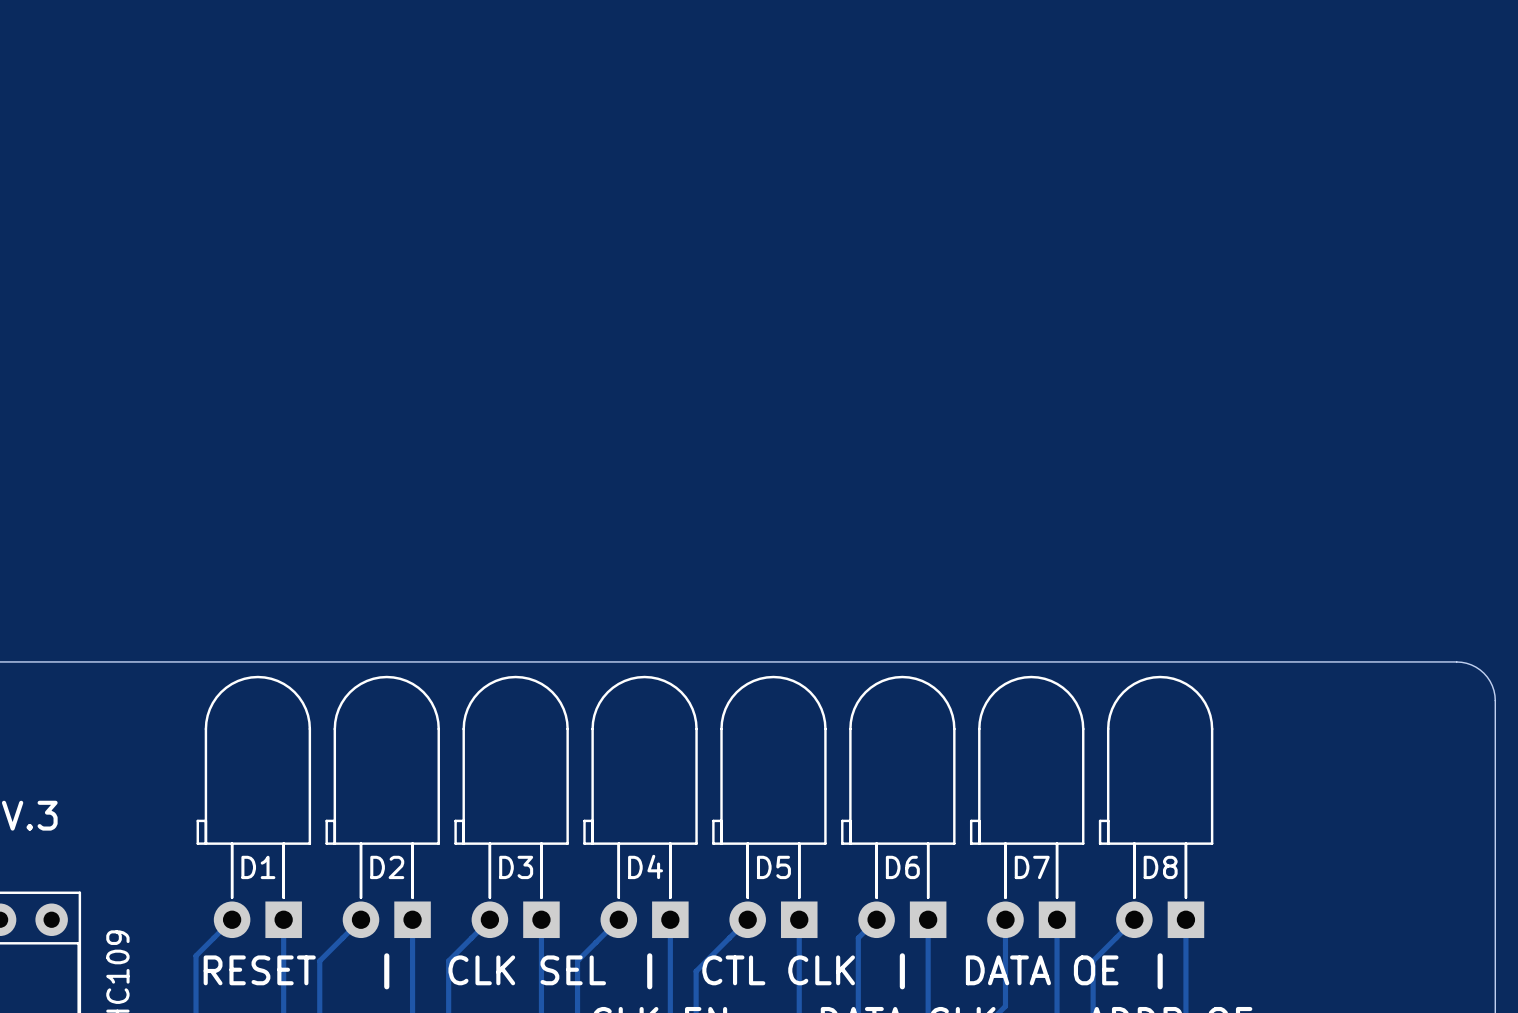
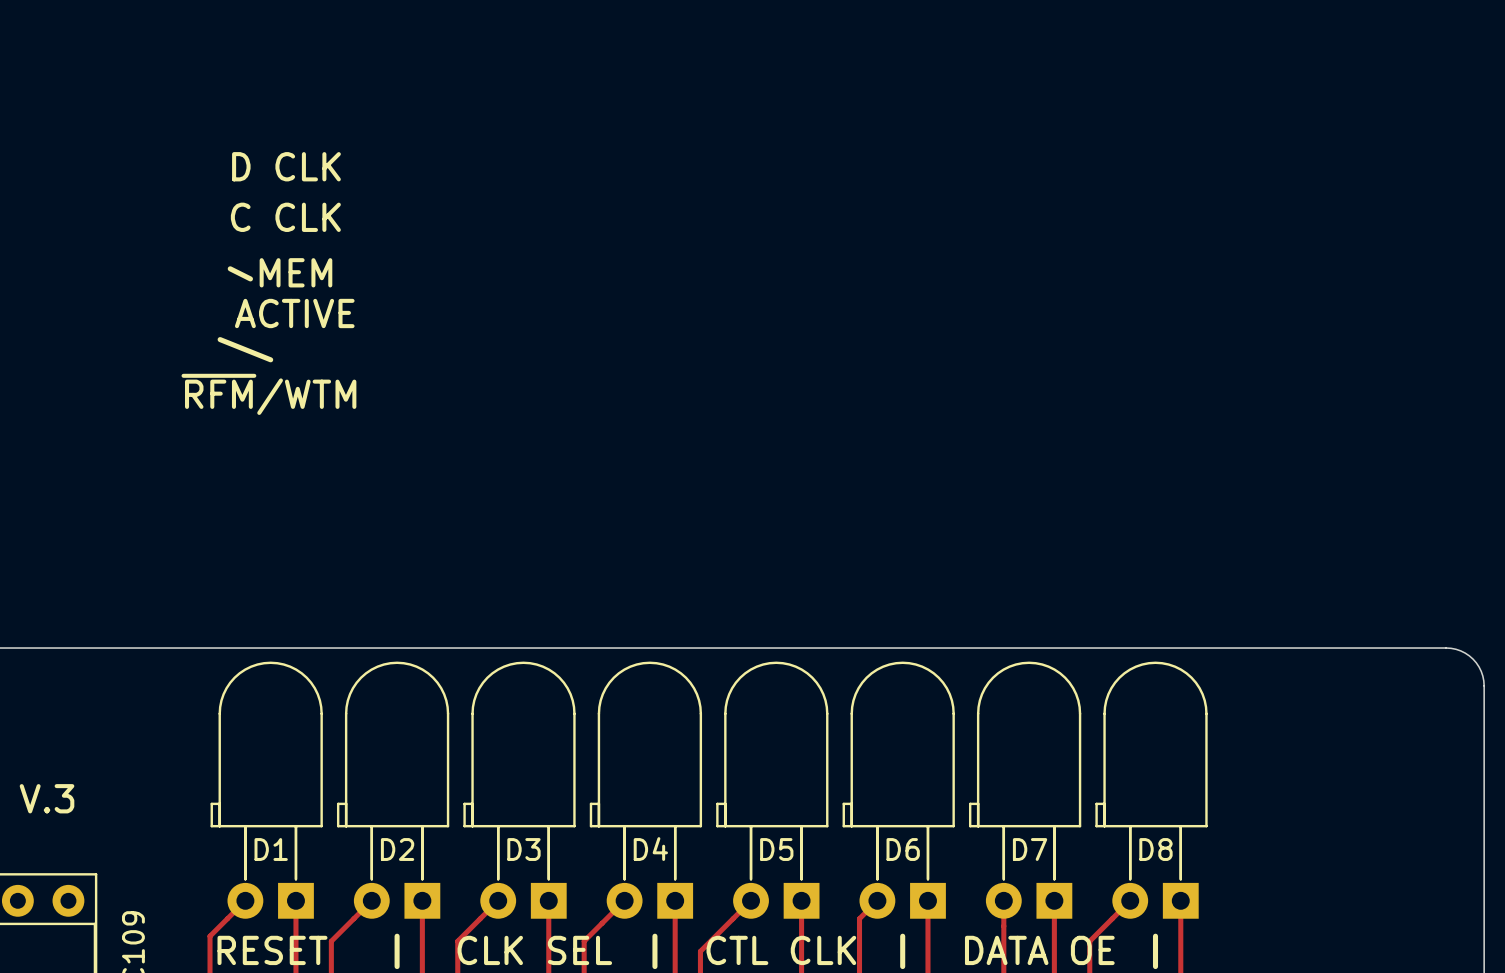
text: none -> D CLK (286, 166)
text: none -> C CLK (285, 217)
line: none -> (230, 268) (250, 278)
text: none -> MEM (295, 272)
text: none -> ACTIVE (294, 313)
line: none -> (220, 339) (270, 359)
text: none -> ~{RFM}/WTM (268, 394)

